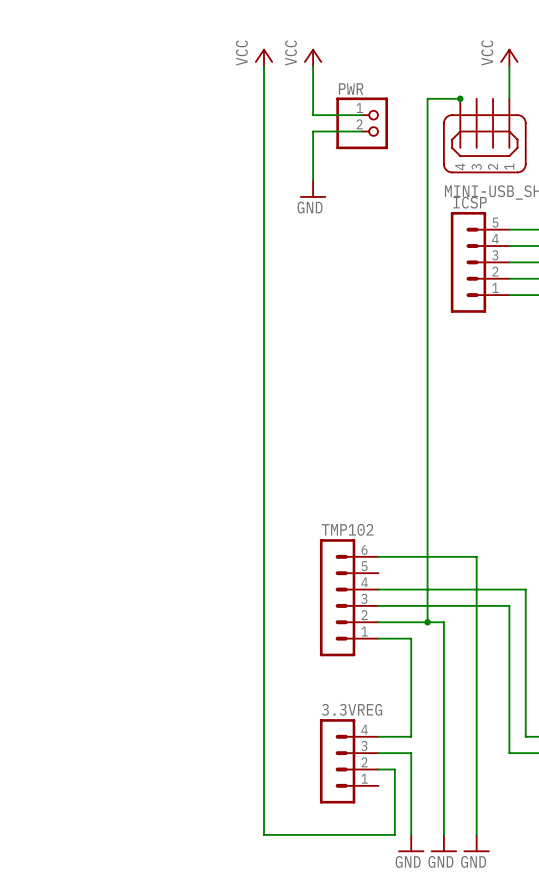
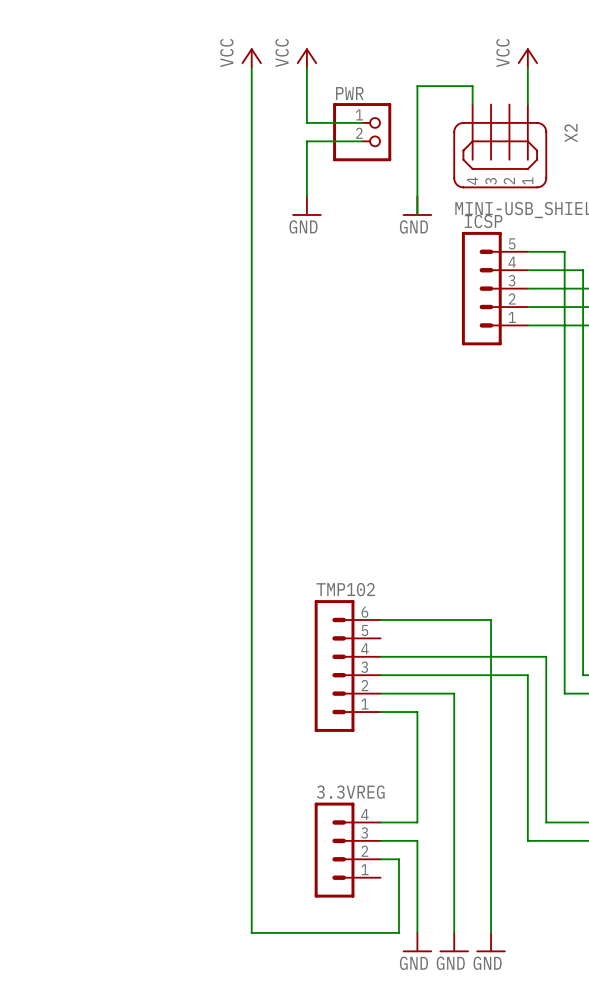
wire: (460, 98) (427, 98) (427, 622) -> (472, 104) (472, 86) (417, 86) (417, 214)
junction: (460, 98) -> none
power symbol: none -> GND (417, 206)
junction: (427, 622) -> none

